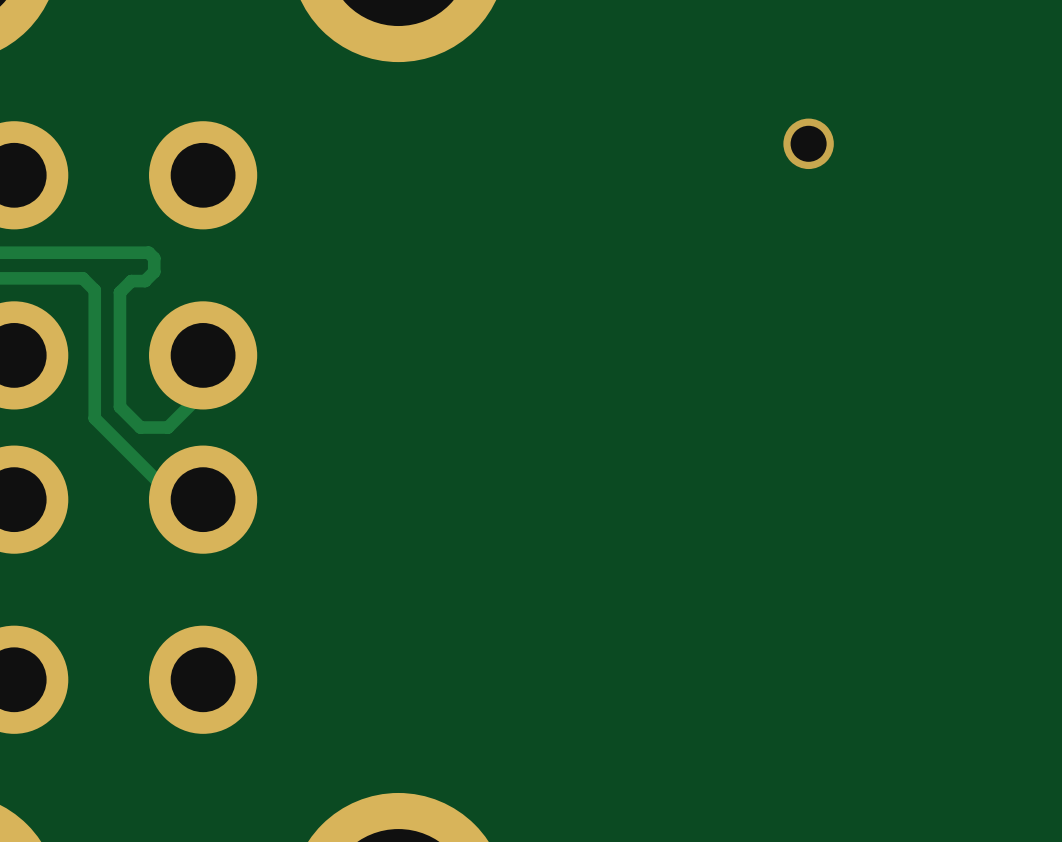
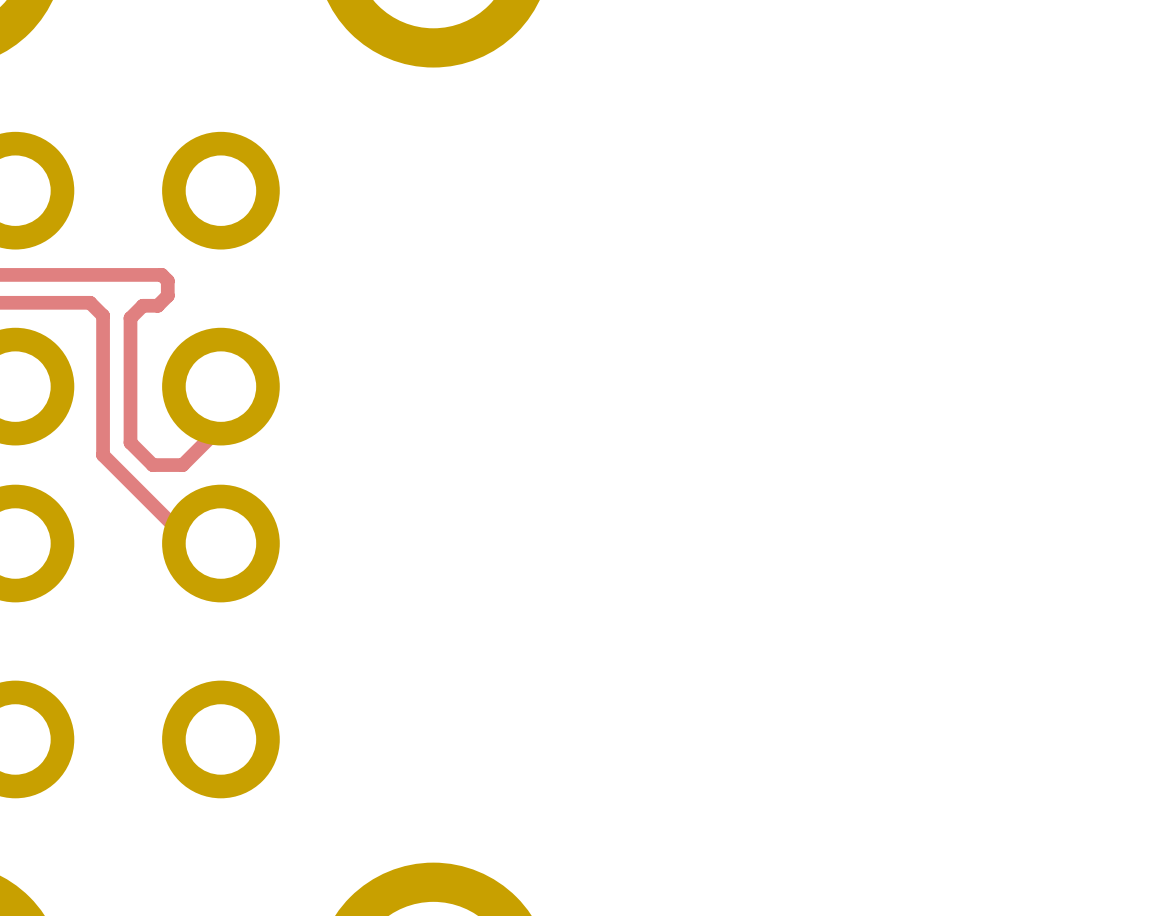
via: (808, 143) -> none

